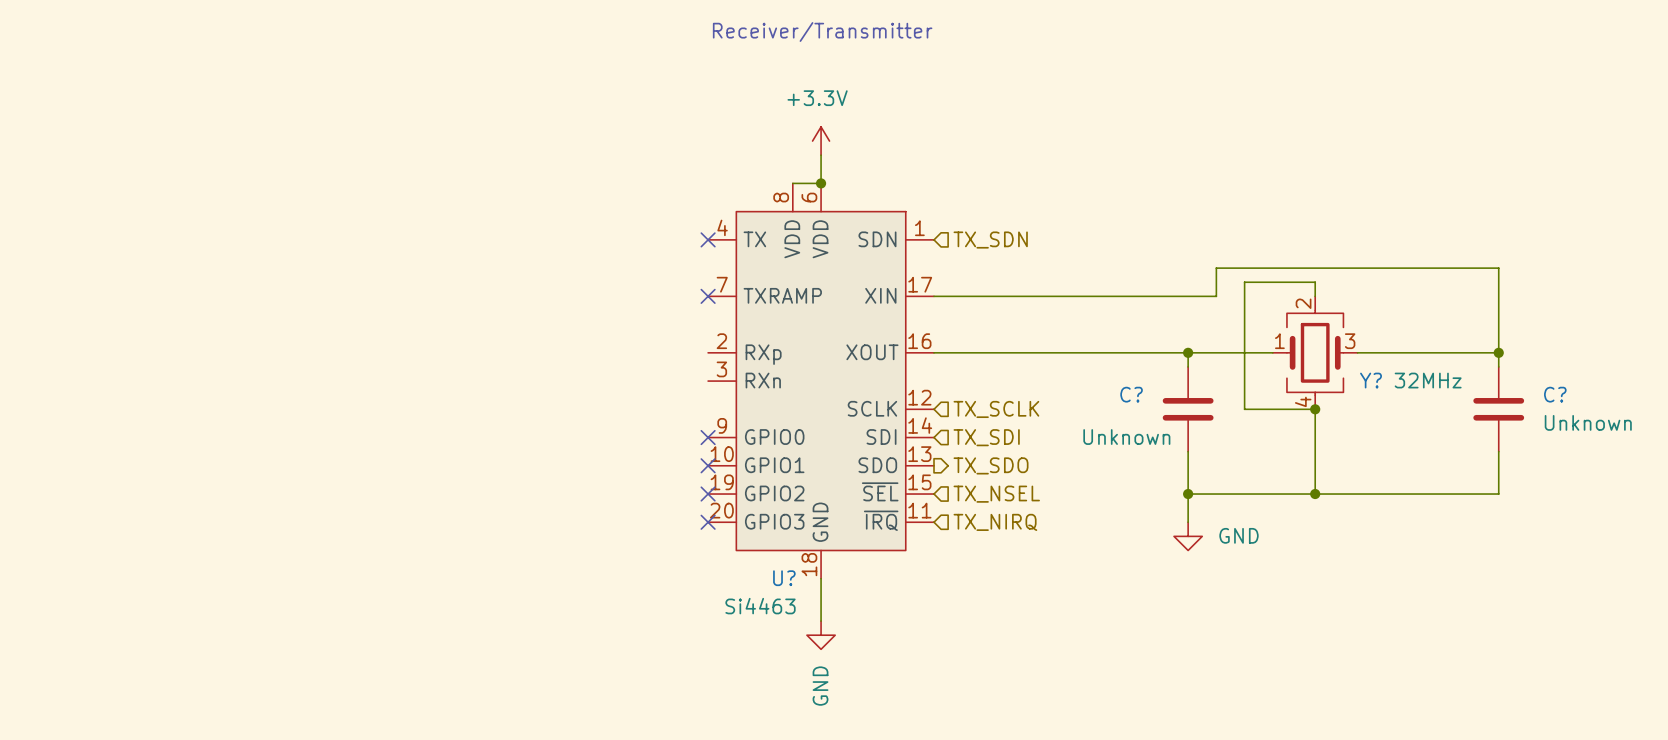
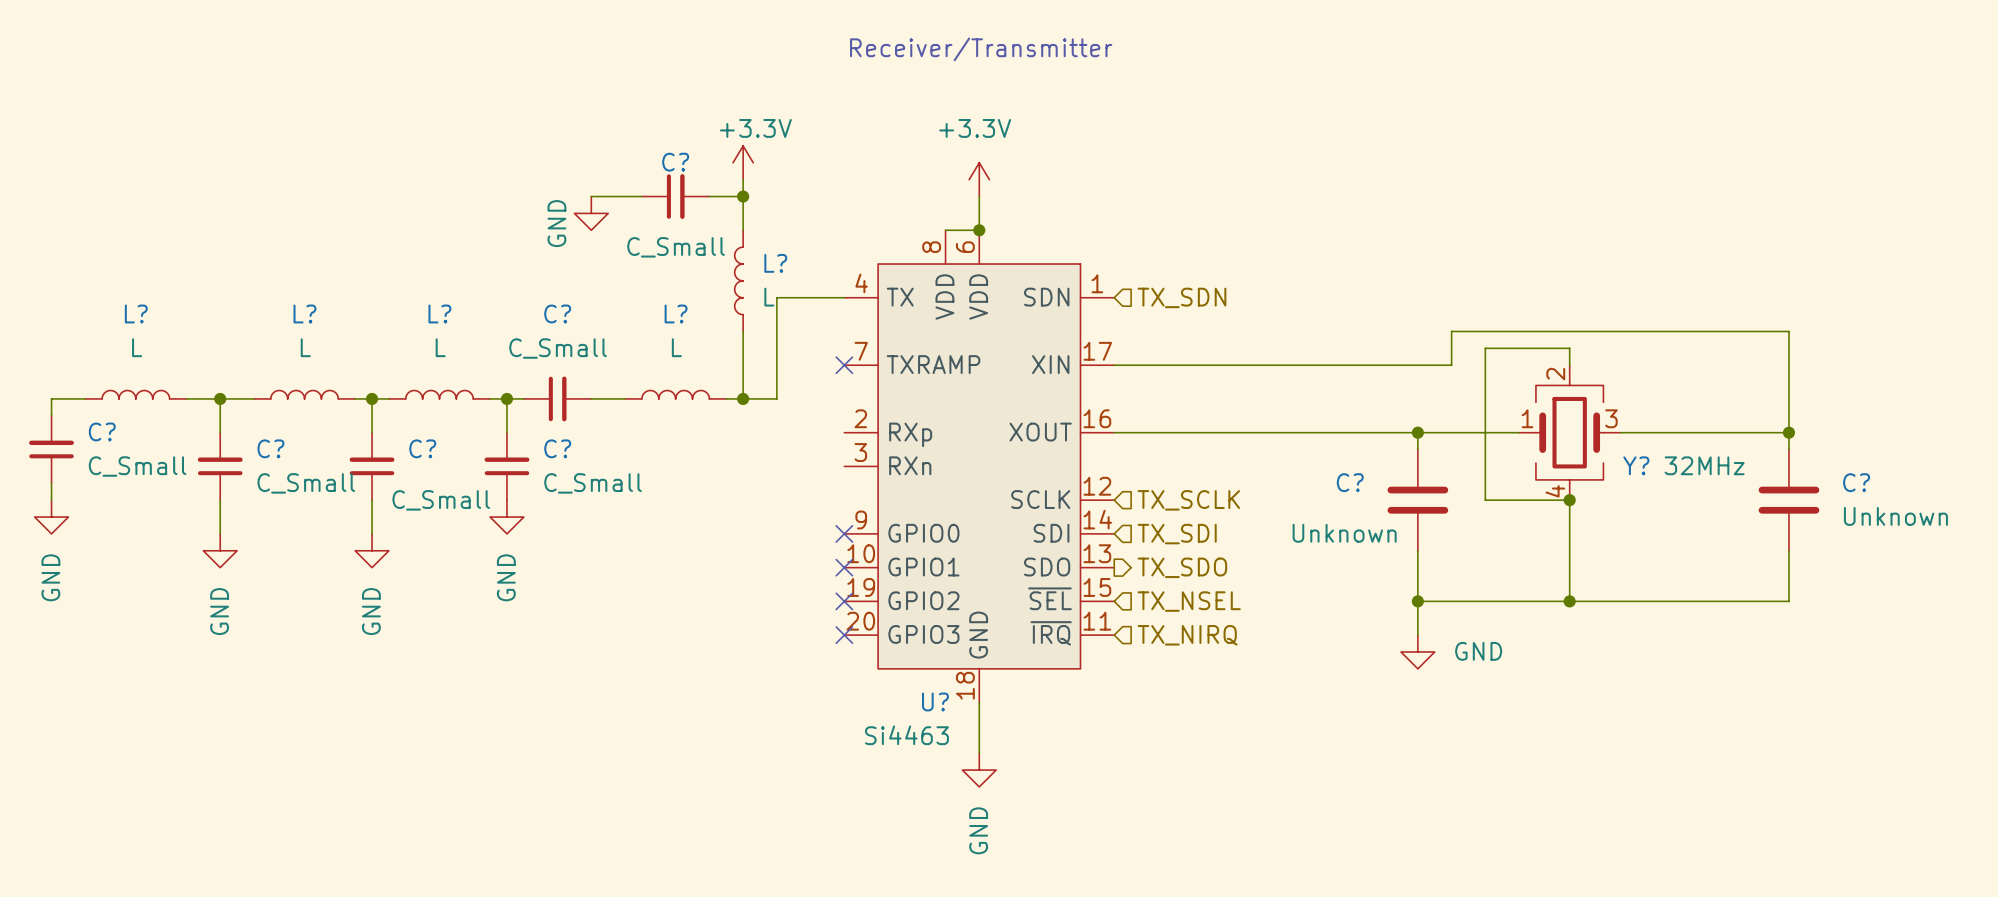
power symbol: none -> +3.3V (743, 162)
wire: none -> (743, 179) (743, 230)
wire: none -> (591, 196) (641, 196)
C?: none -> C_Small (675, 196)
wire: none -> (709, 196) (743, 196)
junction: none -> (743, 196)
power symbol: none -> GND (591, 213)
L?: none -> L (738, 280)
wire: none -> (844, 297) (776, 297) (776, 398) (726, 398)
no-connect mark: (708, 239) -> none
wire: none -> (743, 331) (743, 398)
L?: none -> L (135, 394)
L?: none -> L (304, 394)
L?: none -> L (439, 394)
L?: none -> L (675, 394)
wire: none -> (85, 398) (51, 398) (51, 415)
wire: none -> (186, 398) (253, 398)
wire: none -> (220, 398) (220, 432)
junction: none -> (220, 398)
wire: none -> (355, 398) (388, 398)
wire: none -> (372, 398) (372, 432)
junction: none -> (372, 398)
wire: none -> (490, 398) (523, 398)
wire: none -> (506, 398) (506, 432)
junction: none -> (506, 398)
C?: none -> C_Small (557, 398)
wire: none -> (591, 398) (625, 398)
junction: none -> (743, 398)
C?: none -> C_Small (51, 449)
C?: none -> C_Small (220, 466)
C?: none -> C_Small (372, 466)
C?: none -> C_Small (506, 466)
wire: none -> (51, 483) (51, 500)
wire: none -> (220, 500) (220, 533)
wire: none -> (372, 500) (372, 533)
power symbol: none -> GND (51, 517)
power symbol: none -> GND (506, 517)
power symbol: none -> GND (220, 550)
power symbol: none -> GND (372, 550)

